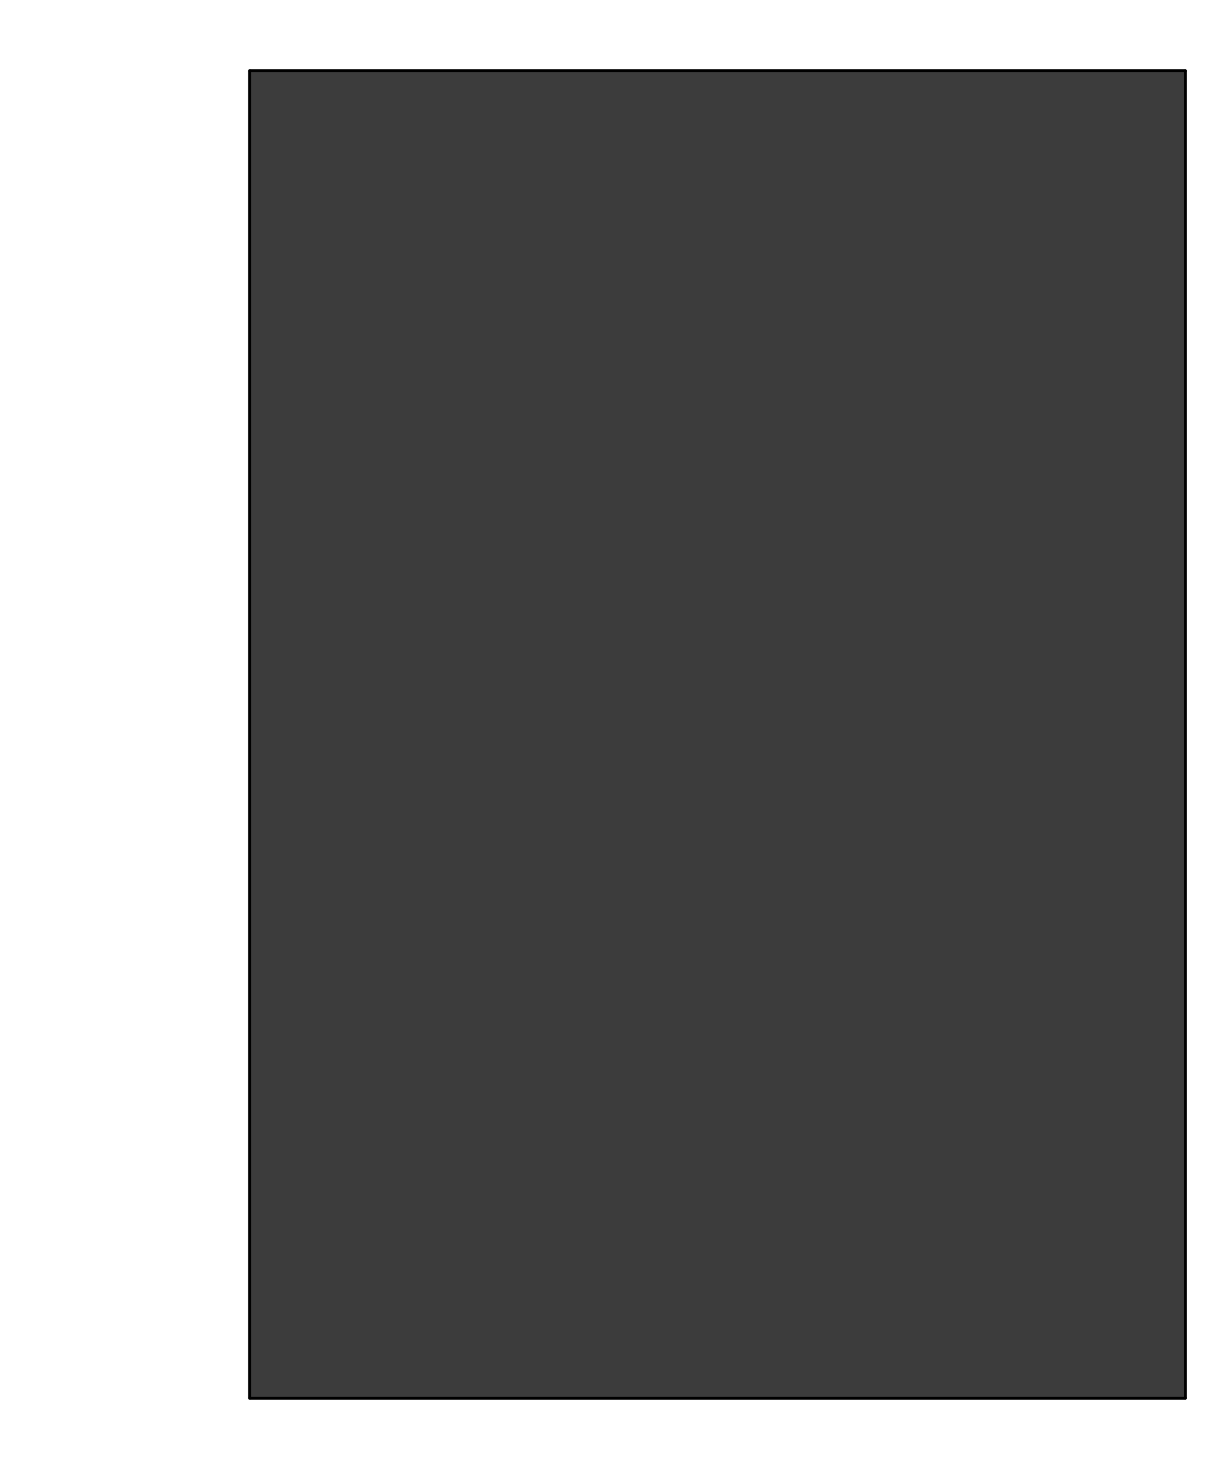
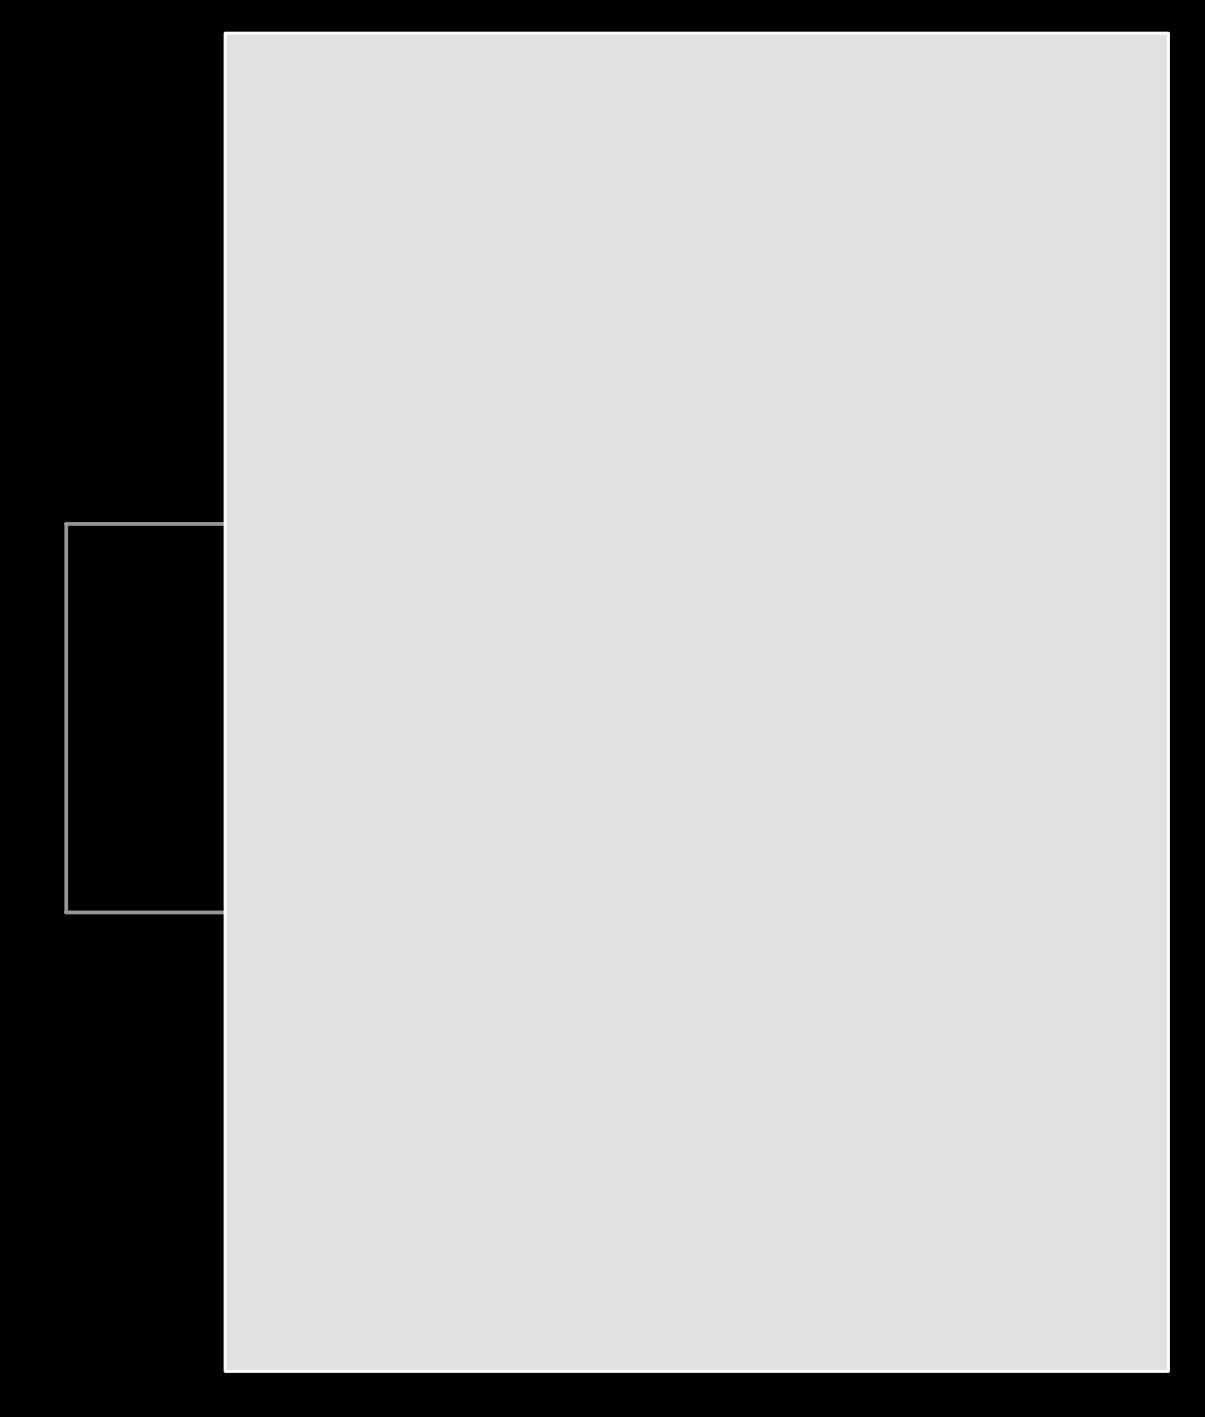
line: none -> (66, 523) (250, 523) (250, 912) (66, 912) (66, 523)

